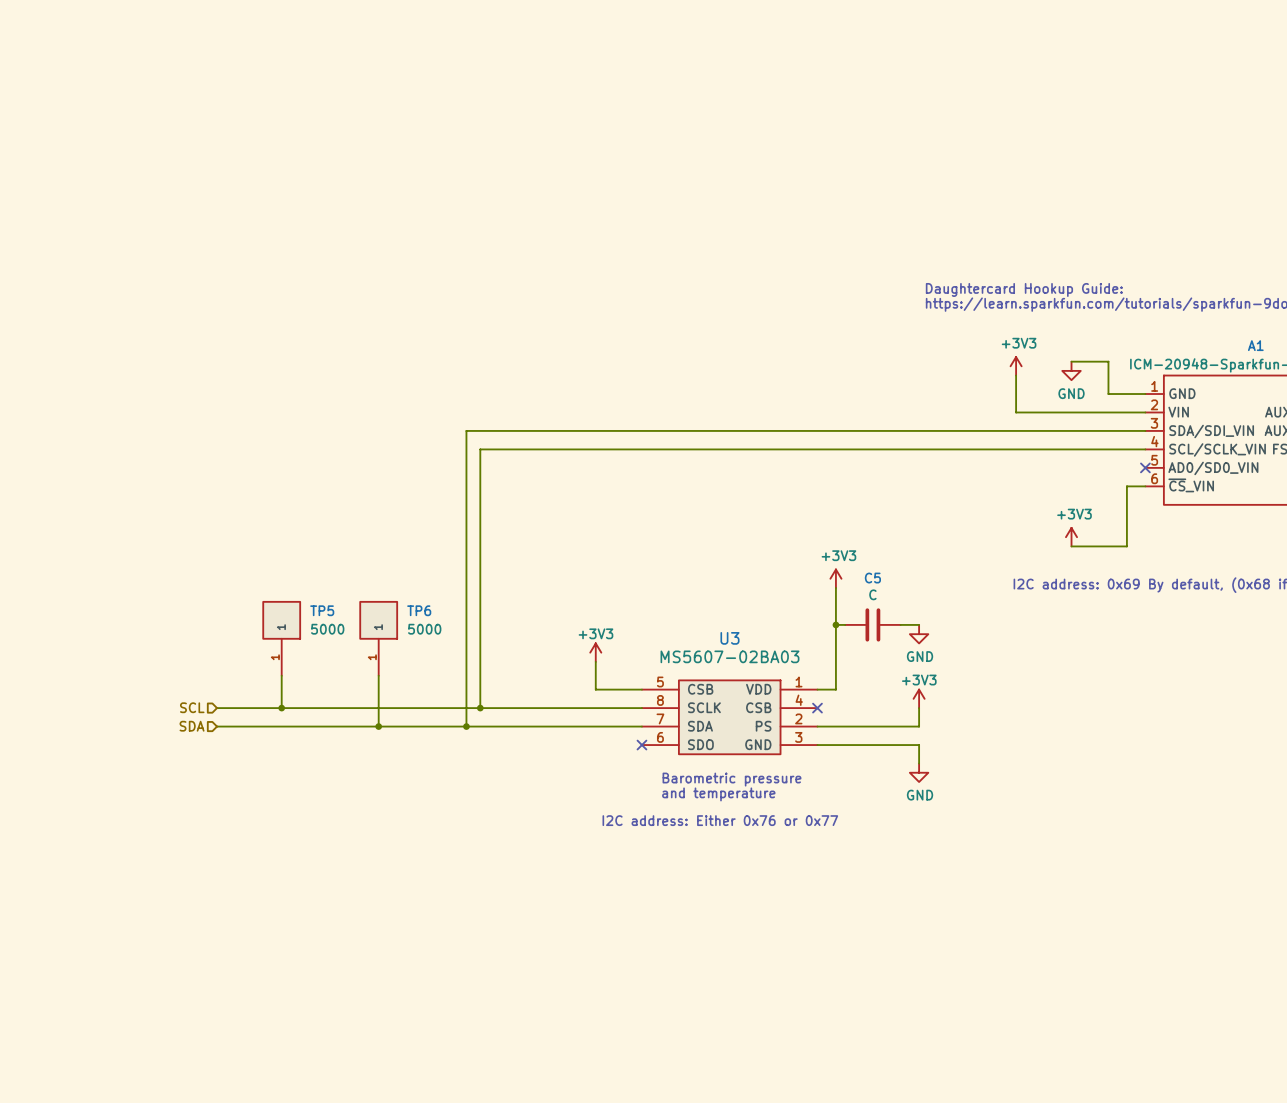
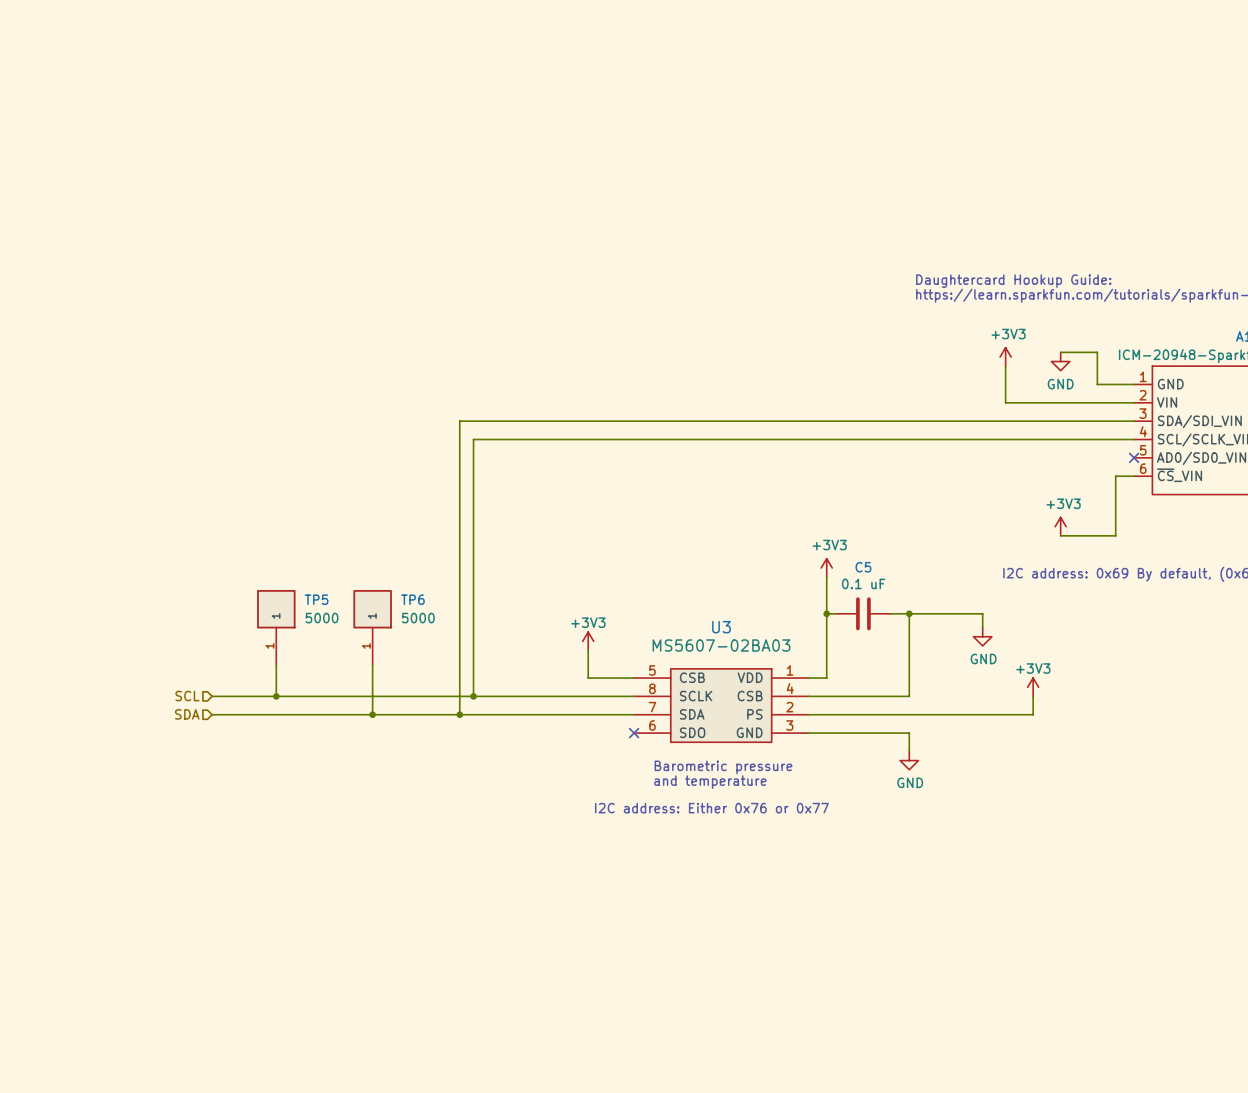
C5 value: C (872, 594) -> 0.1 uF (863, 583)
junction: none -> (909, 613)
power symbol position: GND (919, 634) -> GND (982, 636)
wire: none -> (982, 627) (982, 613) (909, 613) (909, 696) (808, 696)
power symbol position: +3V3 (919, 698) -> +3V3 (1033, 687)
no-connect mark: (817, 708) -> none
wire: (919, 708) (919, 726) -> (1033, 696) (1033, 714) (909, 714)

